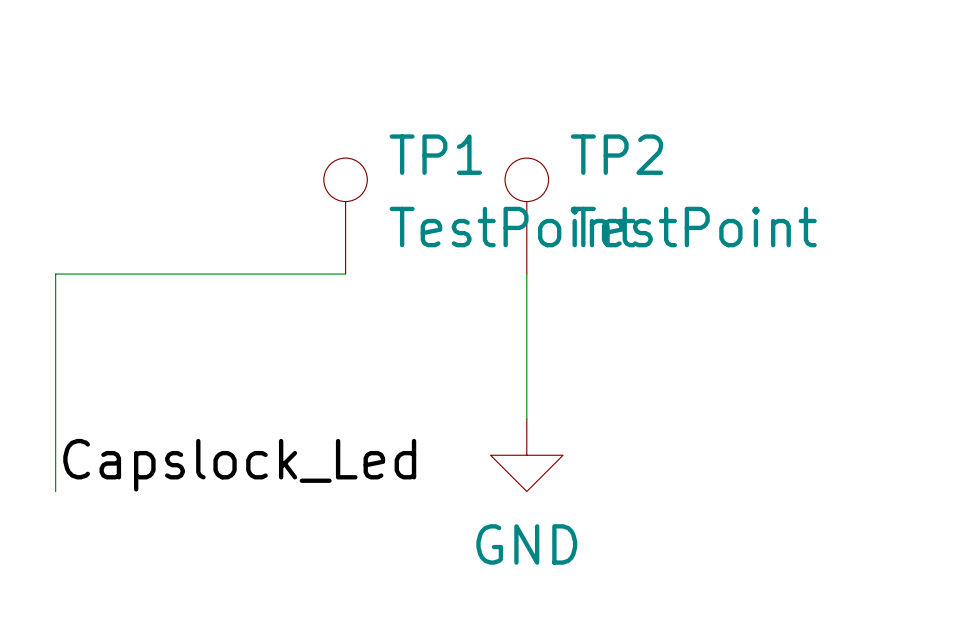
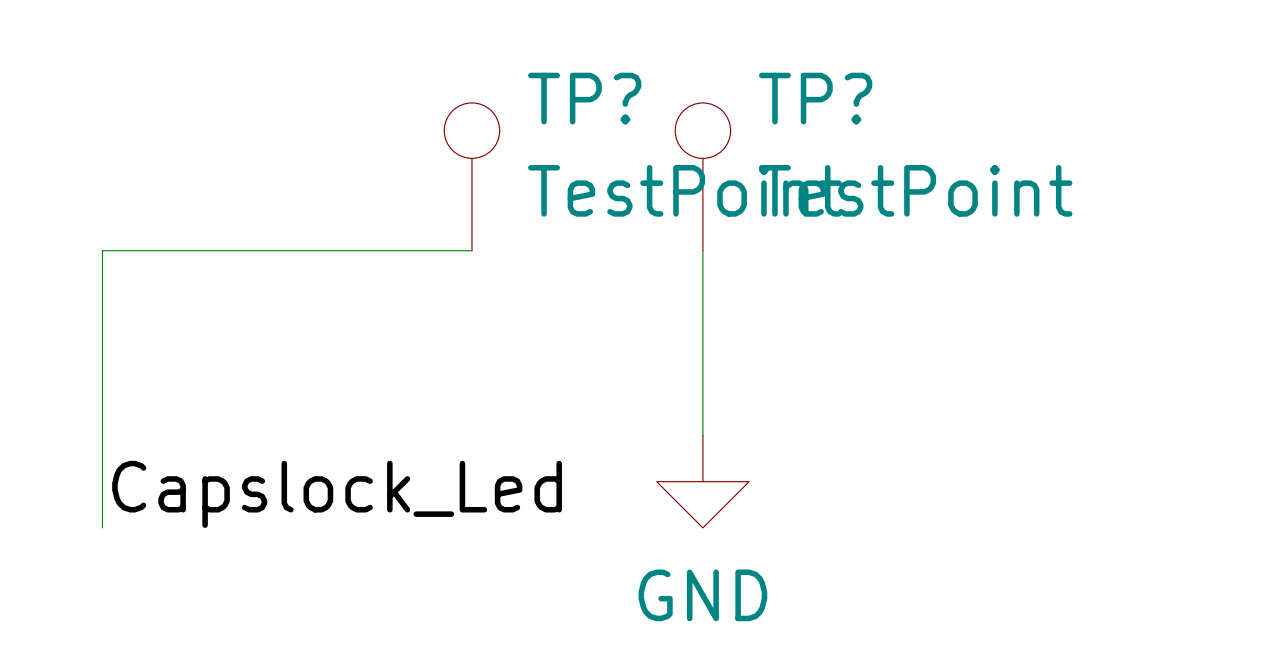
TP1 name: TP1 (435, 154) -> TP? (584, 98)
TP2 name: TP2 (616, 154) -> TP? (815, 98)

